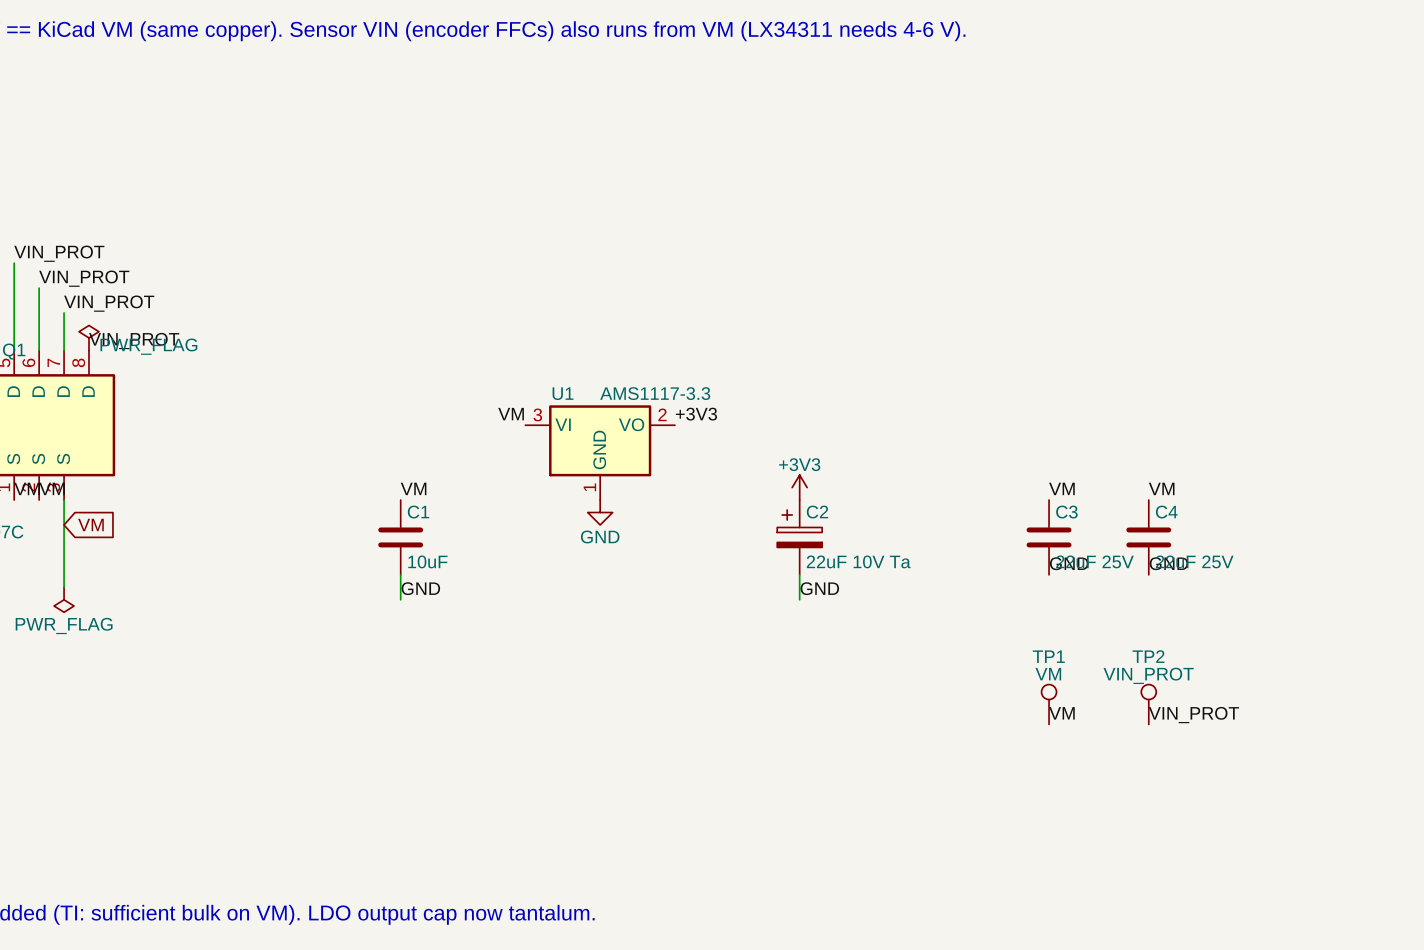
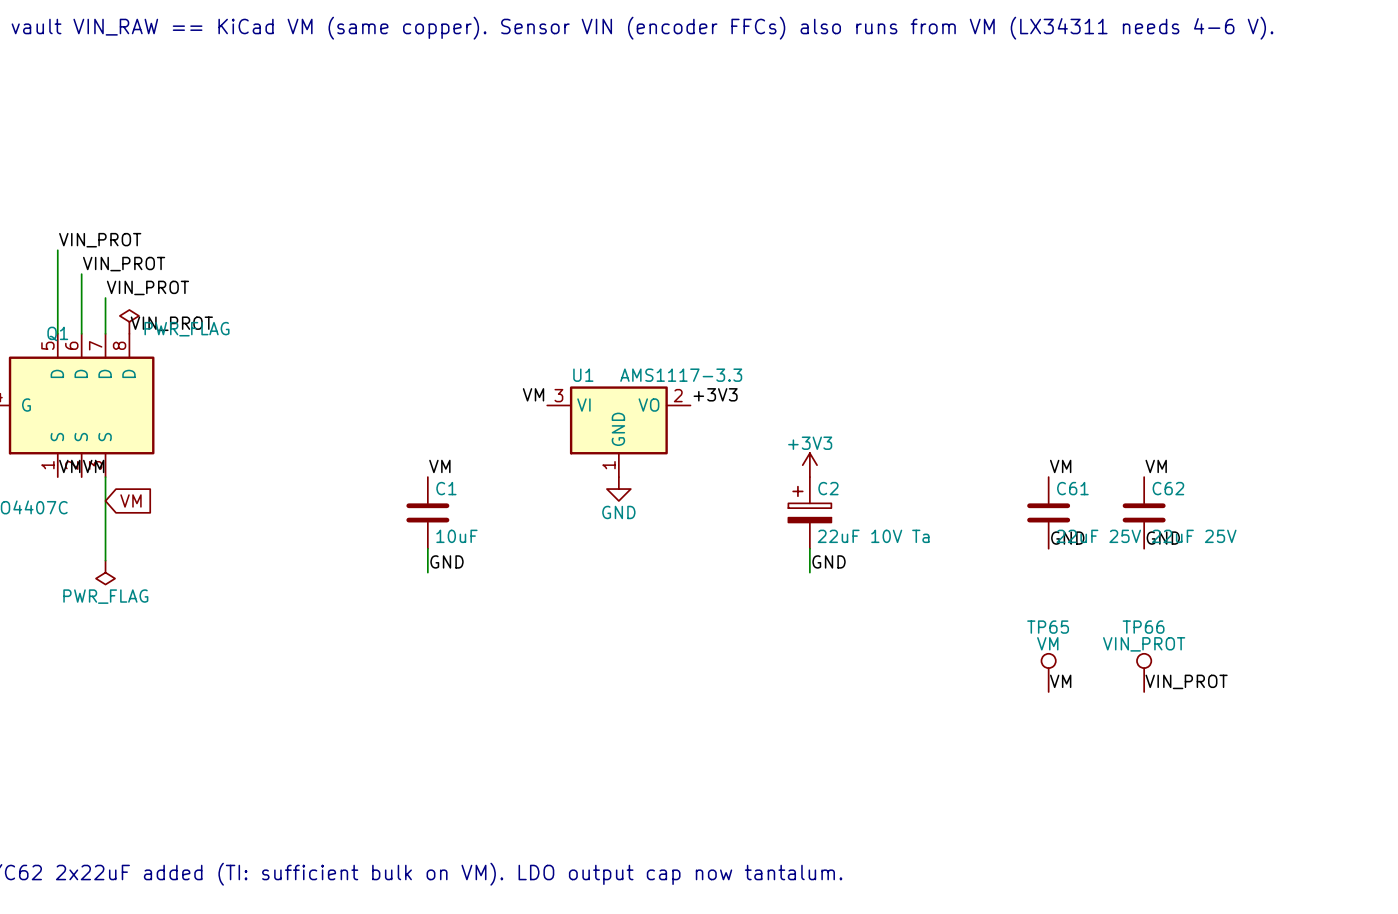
C3 name: C3 (1066, 512) -> C61 (1072, 488)
C4 name: C4 (1166, 512) -> C62 (1168, 488)
TP1 name: TP1 (1048, 656) -> TP65 (1048, 627)
TP2 name: TP2 (1148, 656) -> TP66 (1143, 627)

